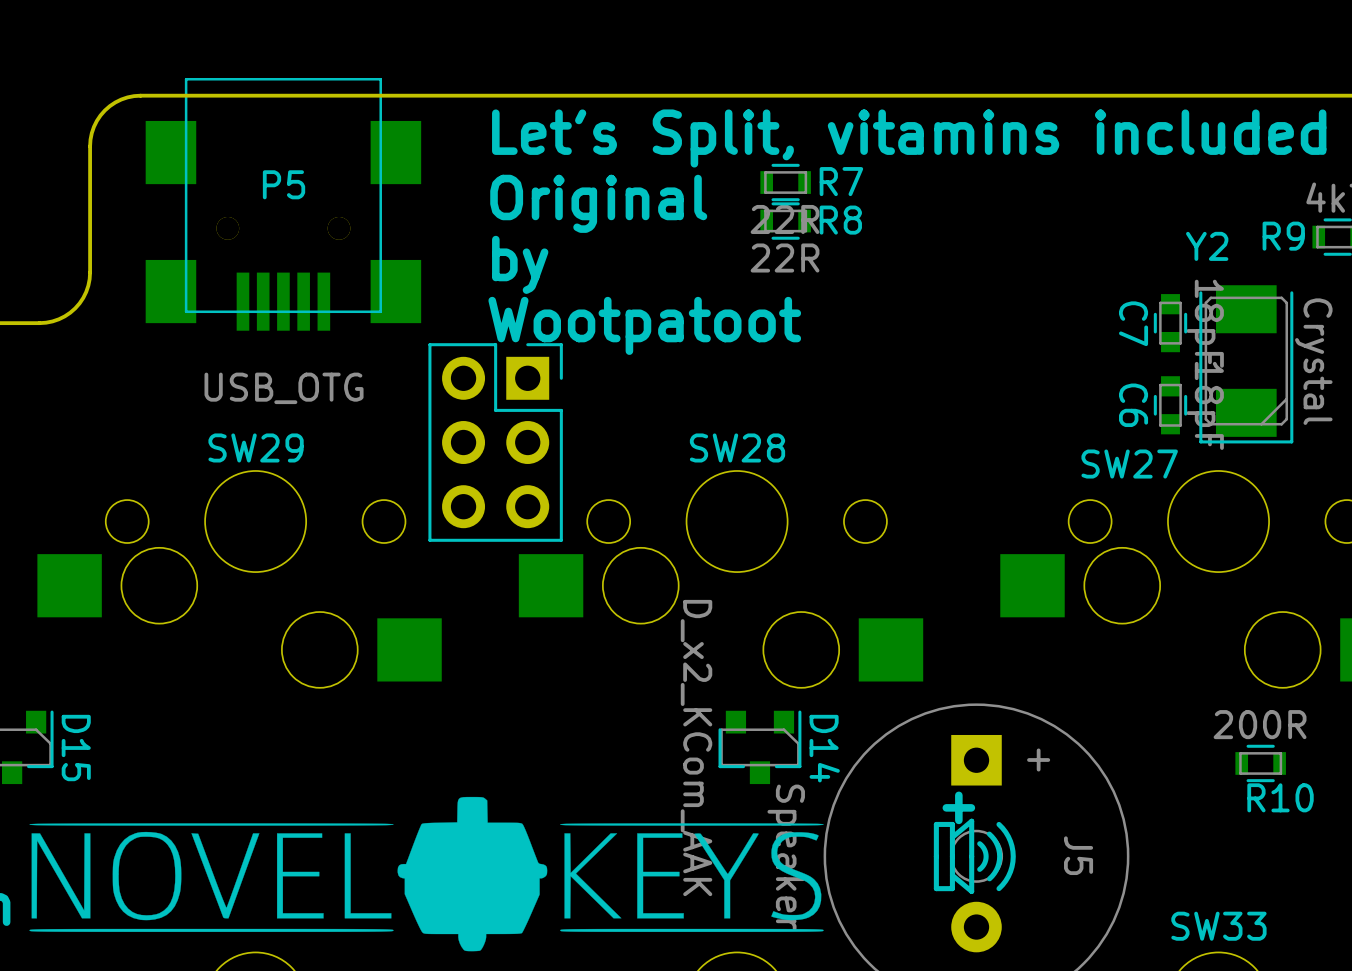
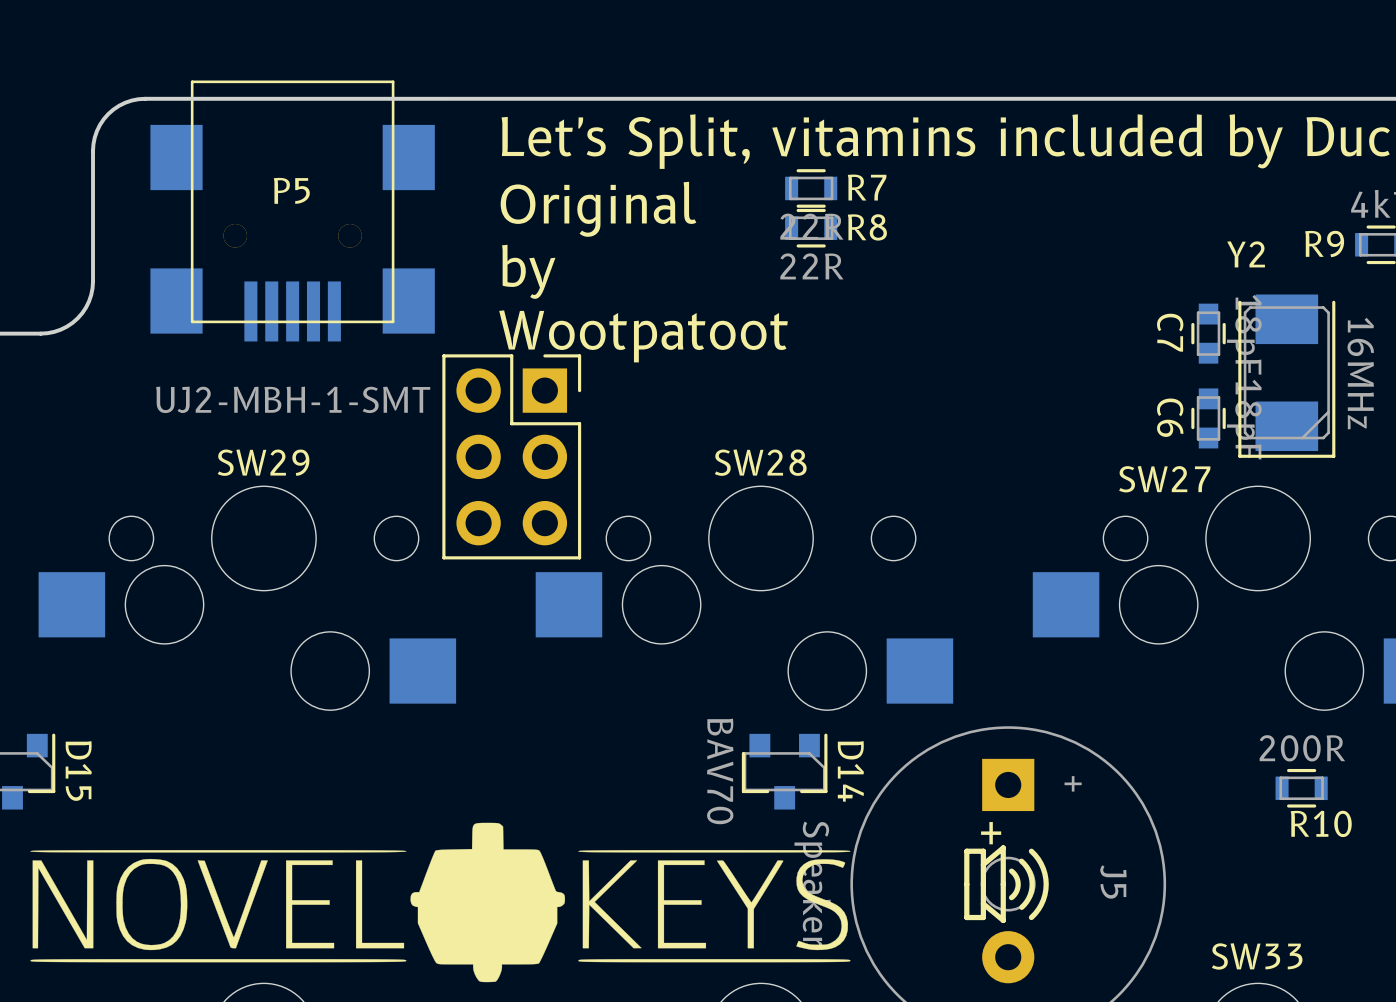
Y2 value: Crystal (1313, 361) -> 16MHz (1360, 373)
P5 value: USB_OTG (284, 388) -> UJ2-MBH-1-SMT (293, 399)
D14 value: D_x2_KCom_AAK (696, 748) -> BAV70 (720, 771)

